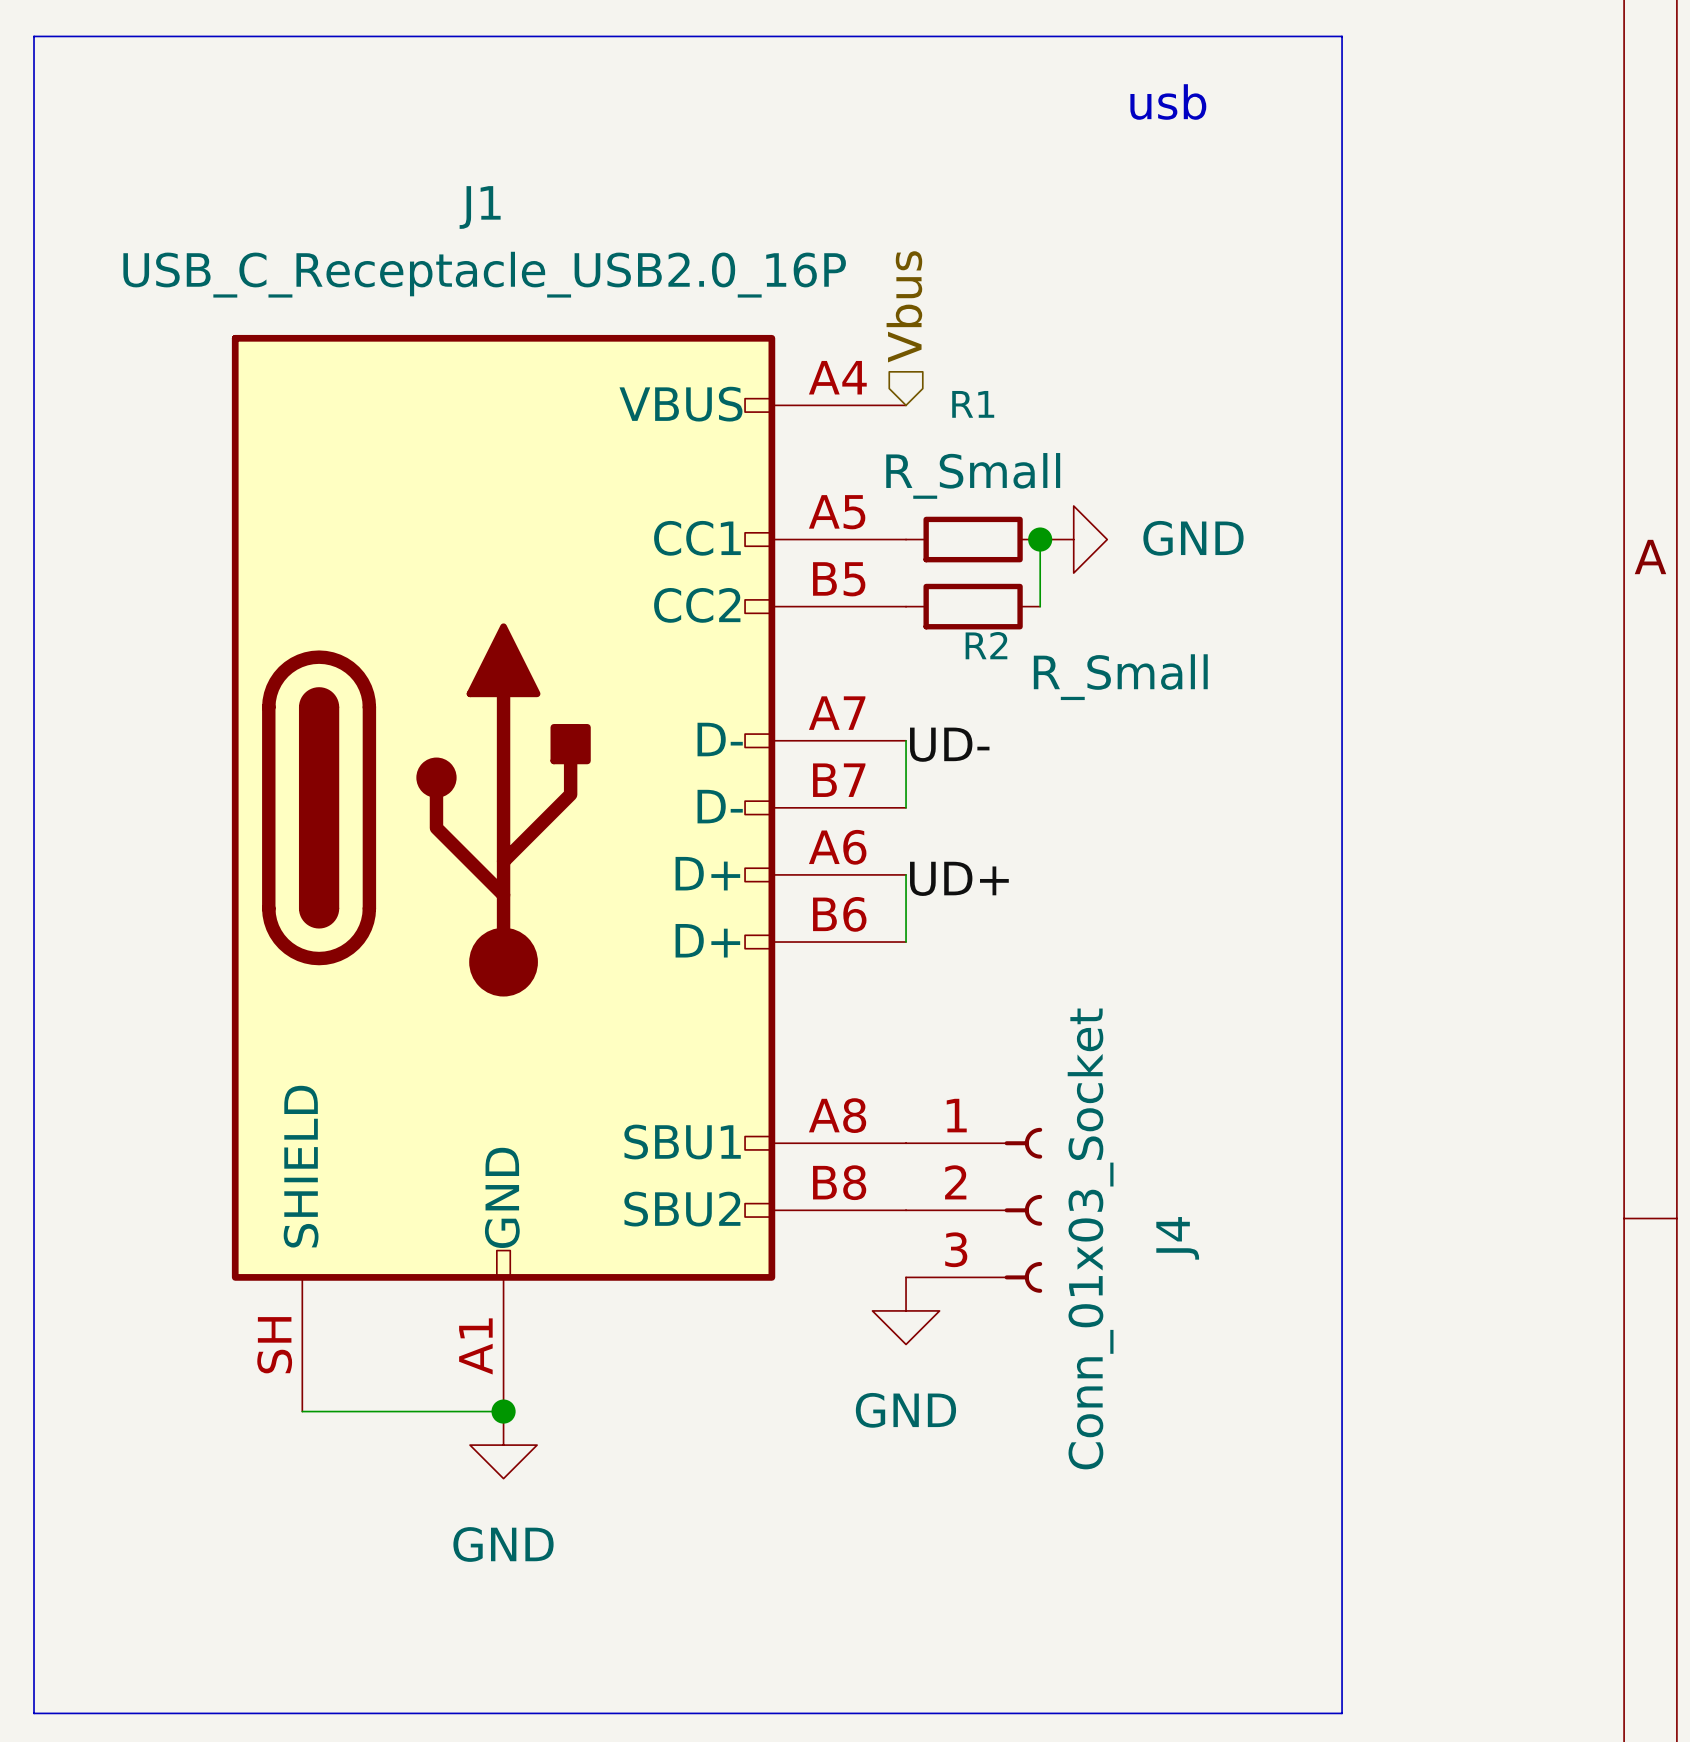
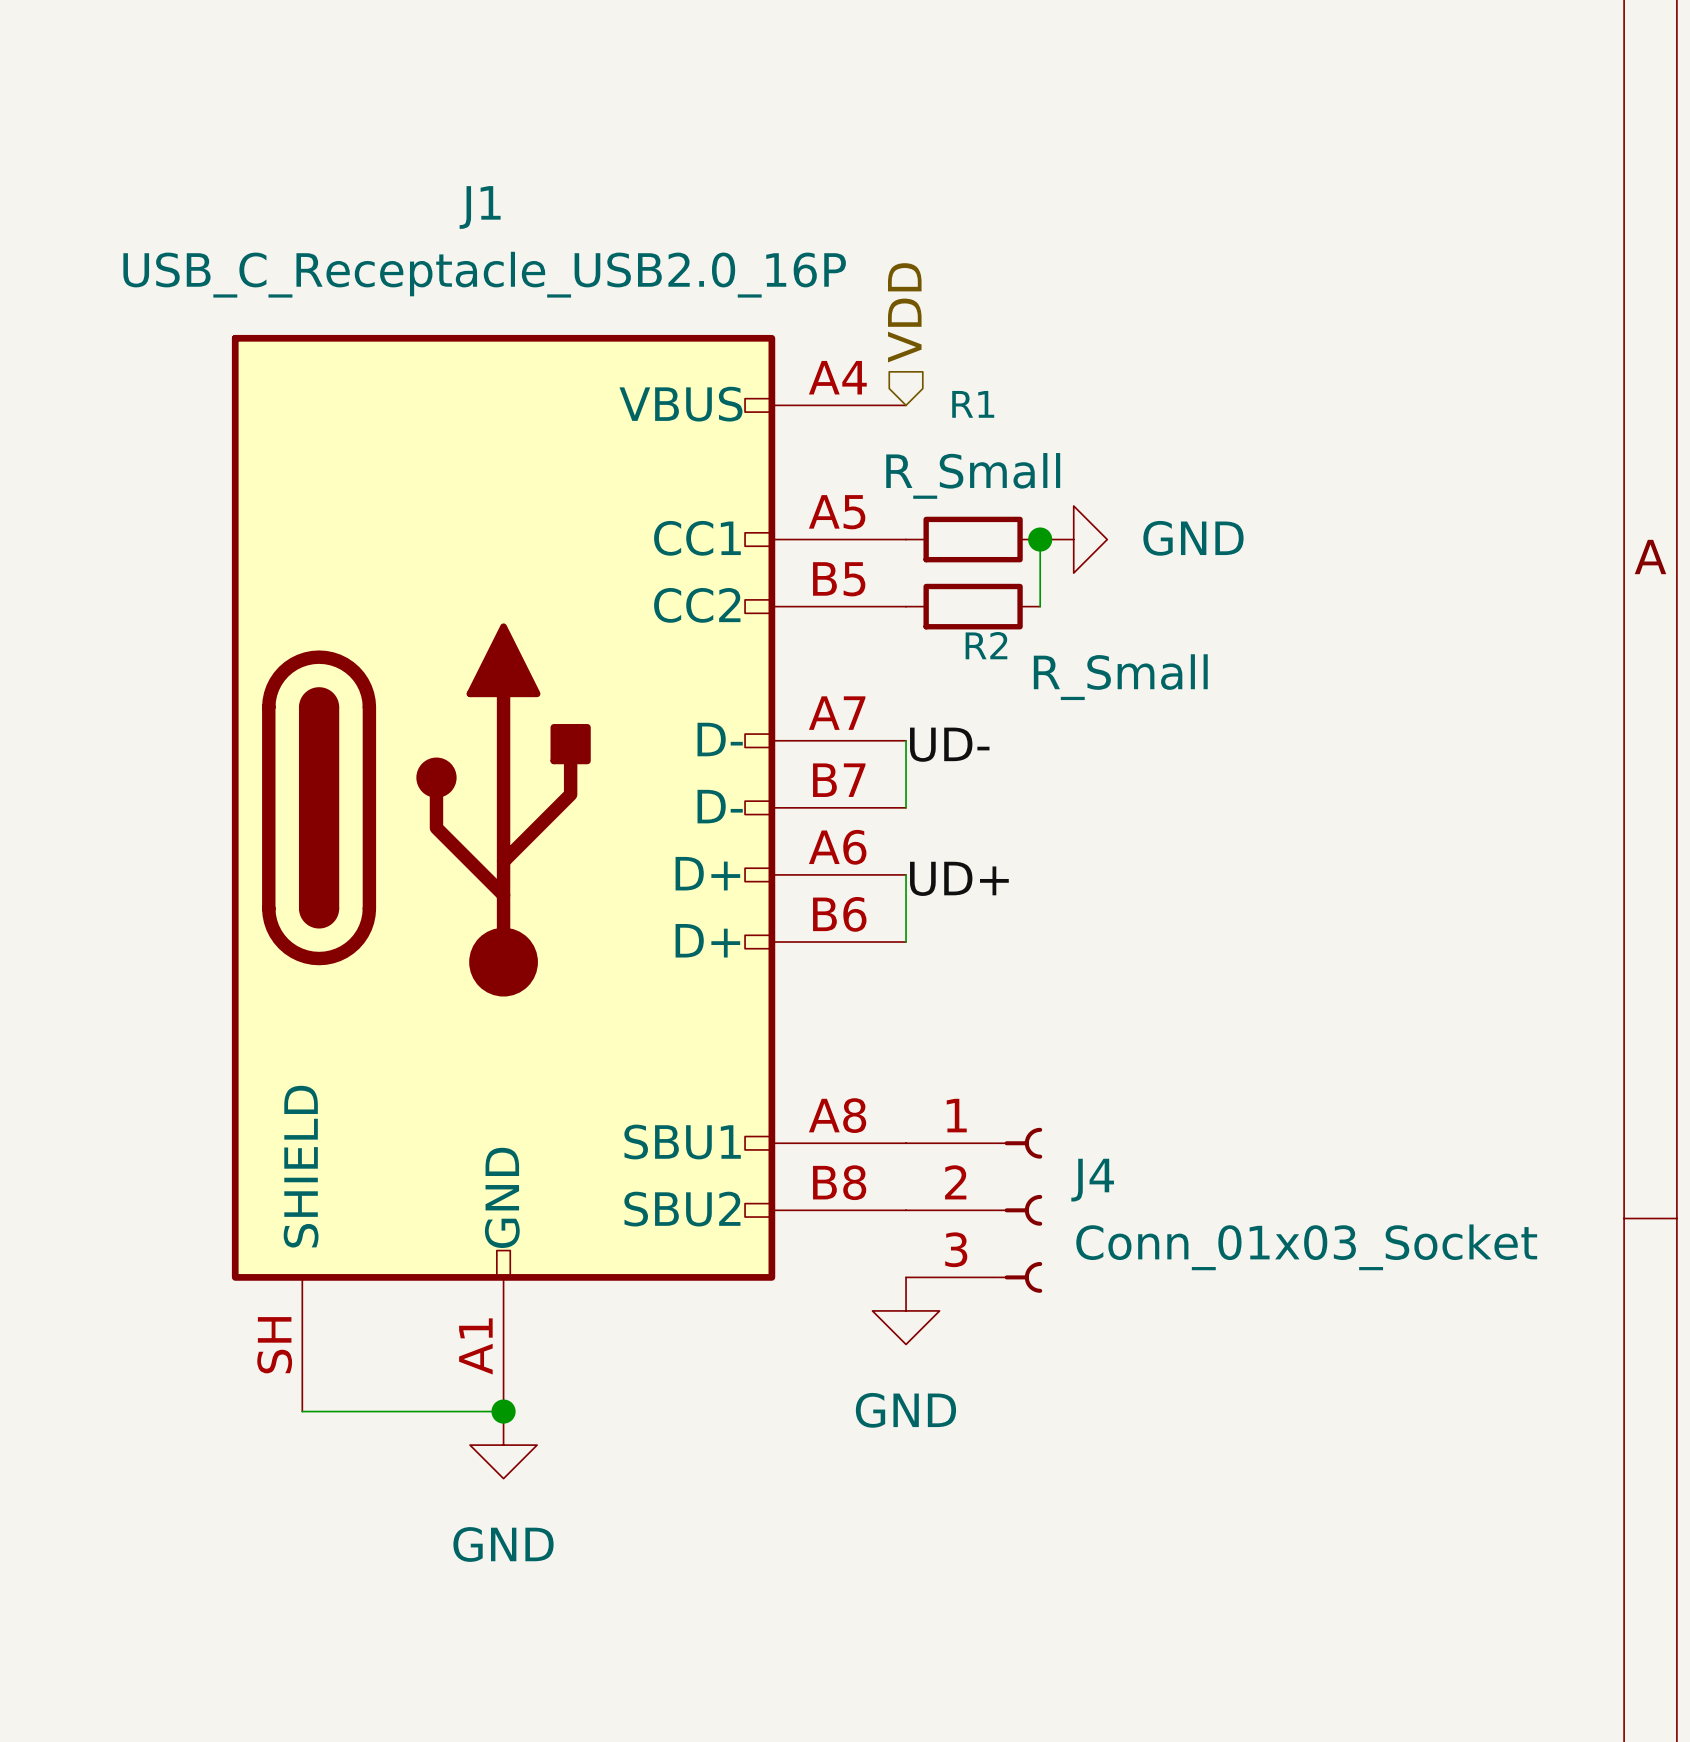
line: (34, 36) (1342, 36) (1342, 1713) (34, 1713) (34, 36) -> none
text: usb (1168, 102) -> none
hierarchical label: Vbus (904, 306) -> VDD (904, 312)
J4 value rotation: 0° (1090, 1238) -> 90° clockwise (1306, 1247)
J4 name rotation: 0° (1177, 1238) -> 90° clockwise (1092, 1180)

